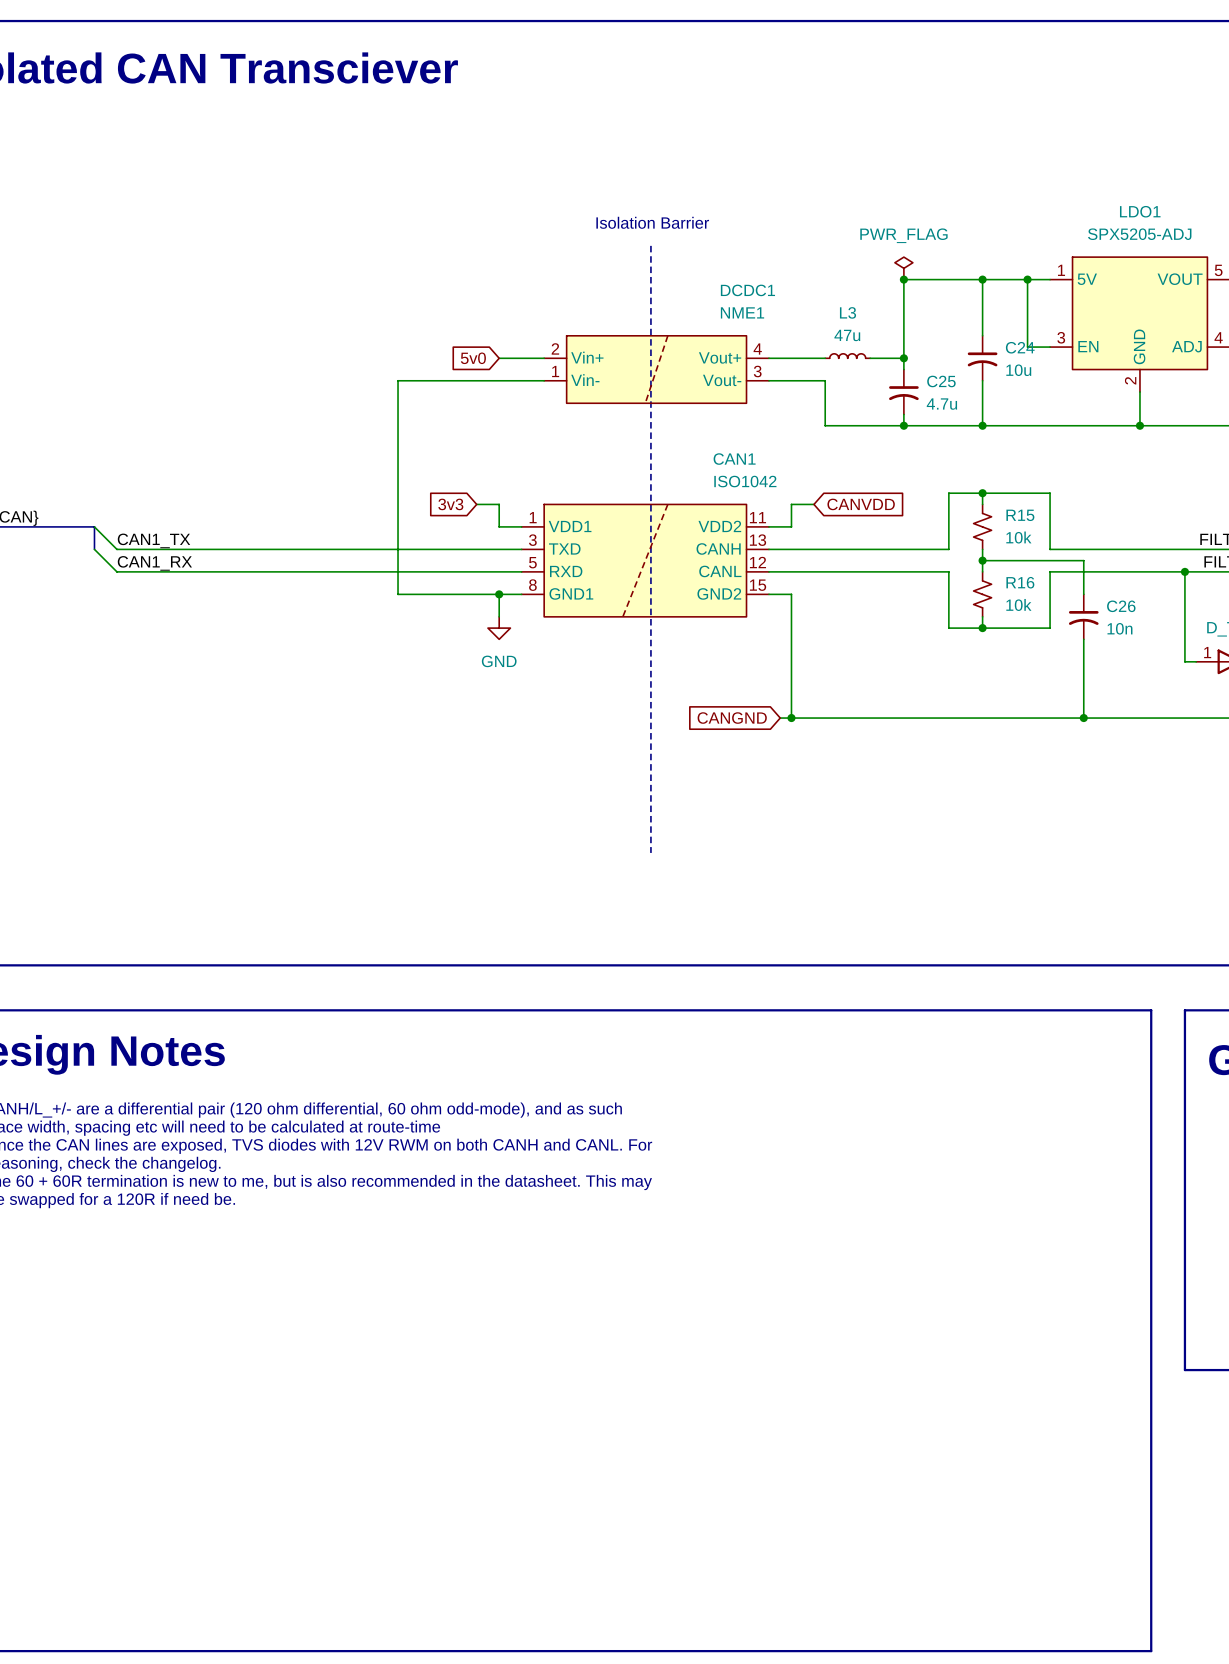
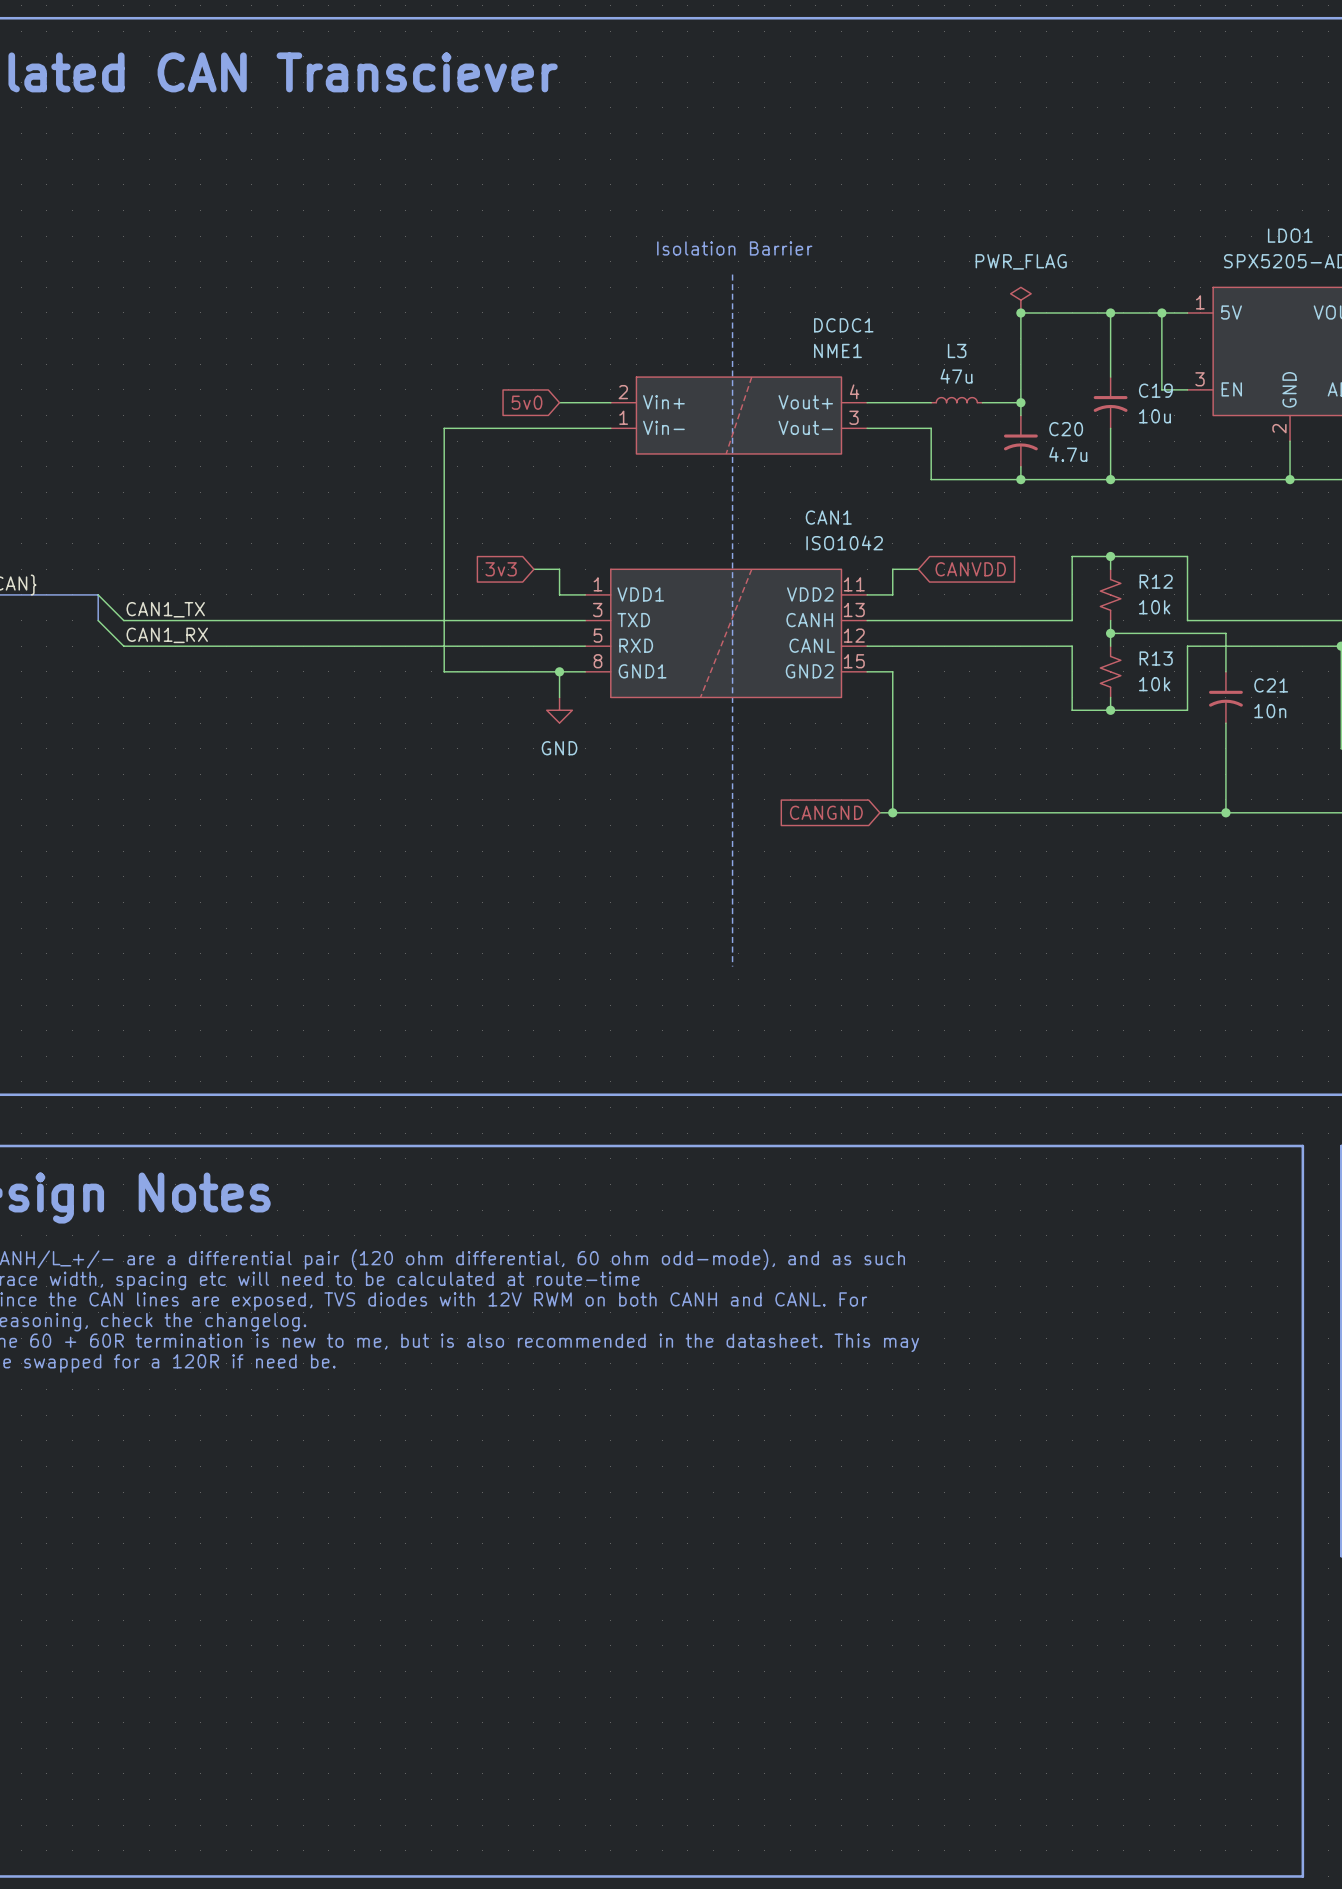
C24 name: C24 (1020, 347) -> C19 (1155, 390)
C25 name: C25 (941, 381) -> C20 (1066, 429)
R15 name: R15 (1020, 515) -> R12 (1156, 581)
R16 name: R16 (1020, 582) -> R13 (1156, 658)
C26 name: C26 (1121, 606) -> C21 (1271, 685)

